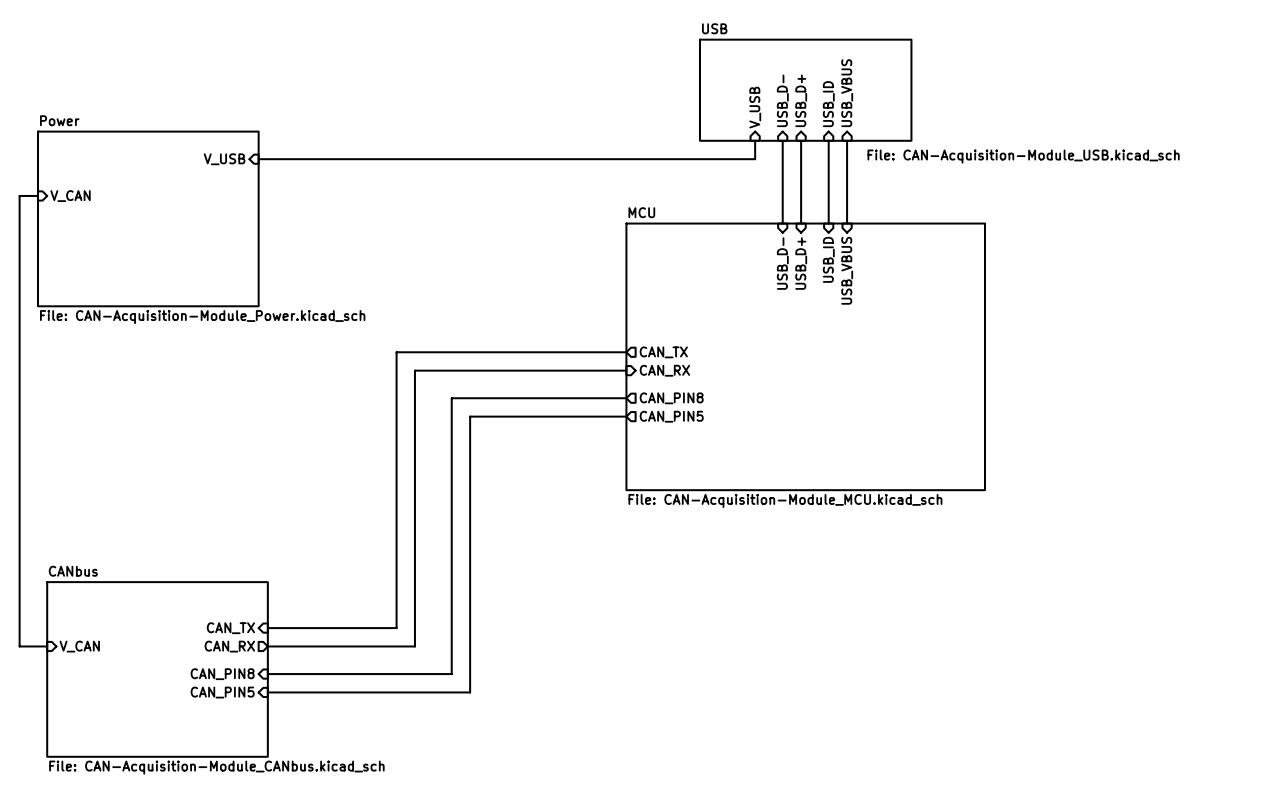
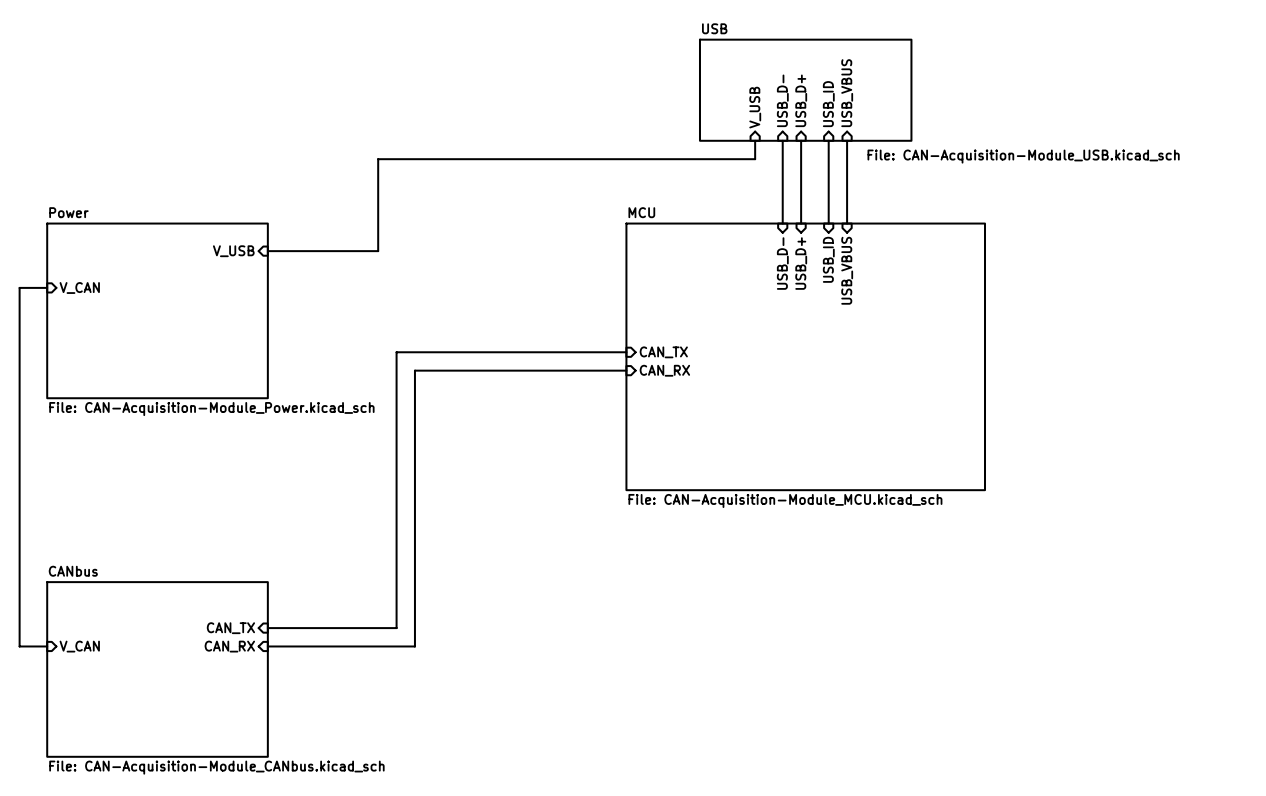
sheet pin position: V_USB (224, 159) -> V_USB (233, 251)
wire: (258, 159) (378, 159) -> (267, 251) (378, 251) (378, 159)
wire: (38, 195) (19, 195) (19, 287) -> (47, 287) (19, 287)
sheet pin position: V_CAN (70, 196) -> V_CAN (79, 288)
sheet Power position: (148, 218) -> (157, 310)
sheet pin shape: output (663, 352) -> input (663, 352)
wire: (626, 398) (451, 398) (451, 674) (267, 674) -> none
sheet pin: CAN_PIN8 (671, 398) -> none
wire: (626, 416) (470, 416) (470, 692) (267, 692) -> none
sheet pin: CAN_PIN5 (671, 416) -> none
sheet pin shape: output (229, 646) -> input (229, 646)
sheet pin: CAN_PIN8 (222, 674) -> none
sheet pin: CAN_PIN5 (222, 692) -> none

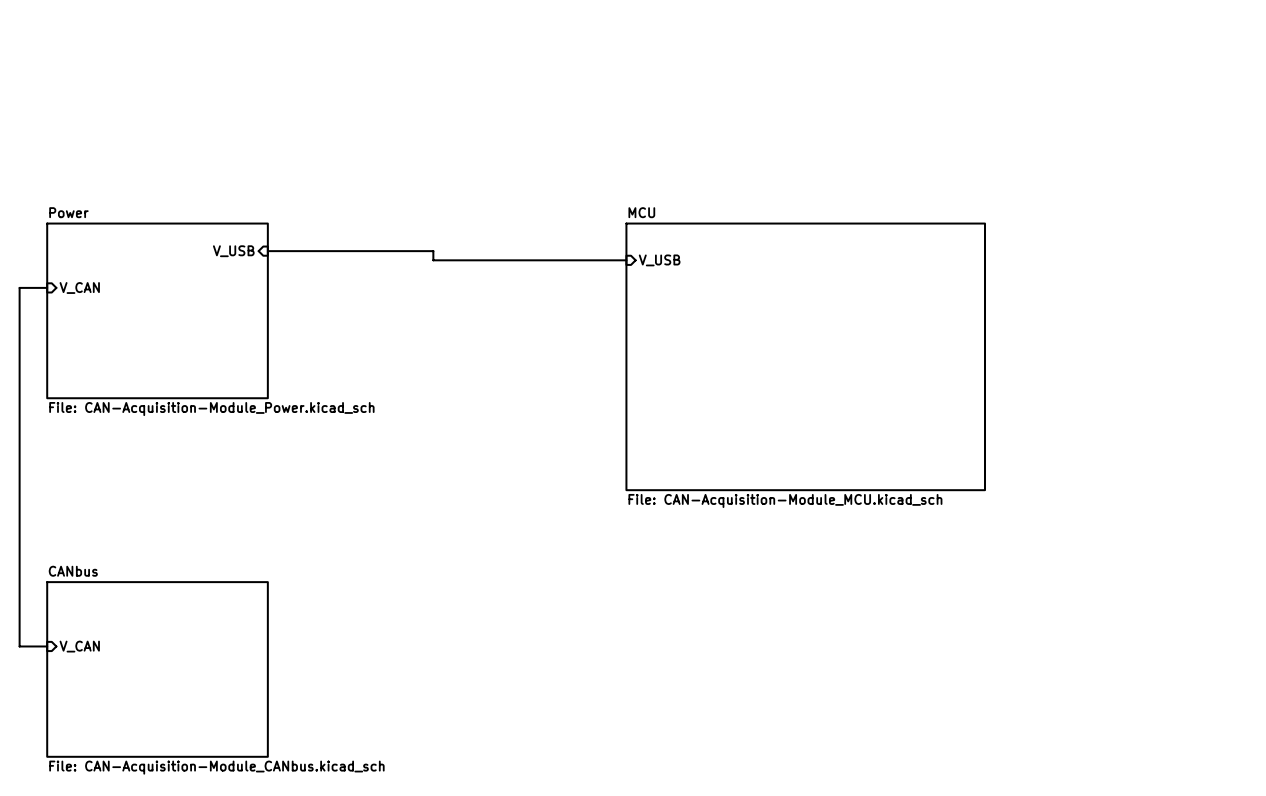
sheet USB: File: CAN-Acquisition-Module_USB.kicad_sch (805, 90) -> none
sheet pin: USB_VBUS (847, 93) -> none
sheet pin: USB_D- (782, 100) -> none
sheet pin: USB_D+ (801, 100) -> none
sheet pin: USB_ID (828, 104) -> none
sheet pin rotation: 0° (755, 107) -> 90° clockwise (659, 260)
sheet pin position: V_USB (755, 107) -> V_USB (659, 260)
wire: (755, 140) (755, 159) (378, 159) (378, 251) -> (626, 260) (433, 260) (433, 251) (378, 251)
wire: (782, 140) (782, 223) -> none
wire: (801, 140) (801, 223) -> none
wire: (828, 140) (828, 223) -> none
wire: (847, 140) (847, 223) -> none
sheet pin: USB_ID (828, 259) -> none
sheet pin: USB_D- (782, 263) -> none
sheet pin: USB_D+ (801, 263) -> none
sheet pin: USB_VBUS (847, 270) -> none
wire: (626, 352) (396, 352) (396, 628) (267, 628) -> none
sheet pin: CAN_TX (663, 352) -> none
wire: (626, 370) (414, 370) (414, 646) (267, 646) -> none
sheet pin: CAN_RX (664, 370) -> none
sheet pin: CAN_TX (230, 628) -> none
sheet pin: CAN_RX (229, 646) -> none

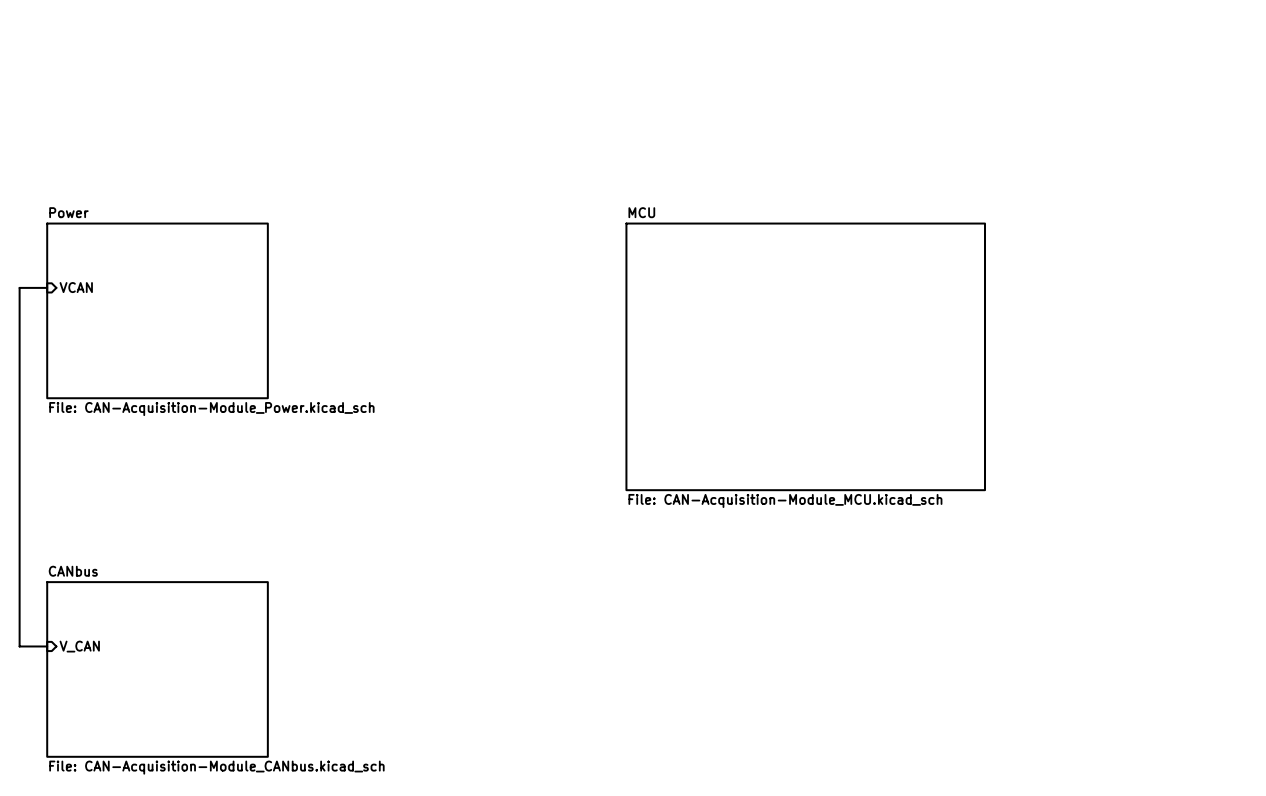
sheet pin: V_USB (233, 251) -> none
wire: (267, 251) (433, 251) (433, 260) (626, 260) -> none
sheet pin: V_USB (659, 260) -> none
sheet pin: V_CAN (79, 288) -> VCAN (76, 287)

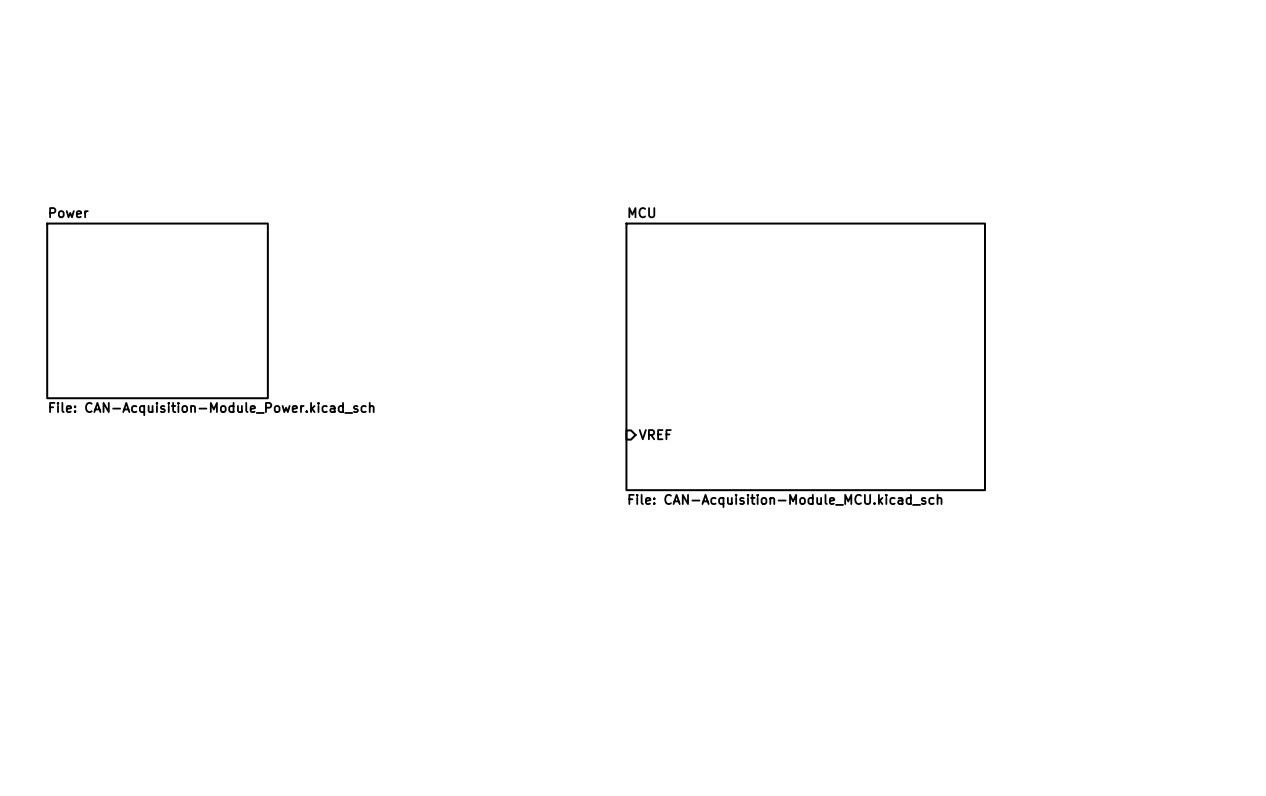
wire: (47, 287) (19, 287) (19, 646) (47, 646) -> none
sheet pin: VCAN (76, 287) -> none
sheet pin: none -> VREF (655, 434)
sheet pin: V_CAN (79, 646) -> none
sheet CANbus: File: CAN-Acquisition-Module_CANbus.kicad_sch (157, 669) -> none

